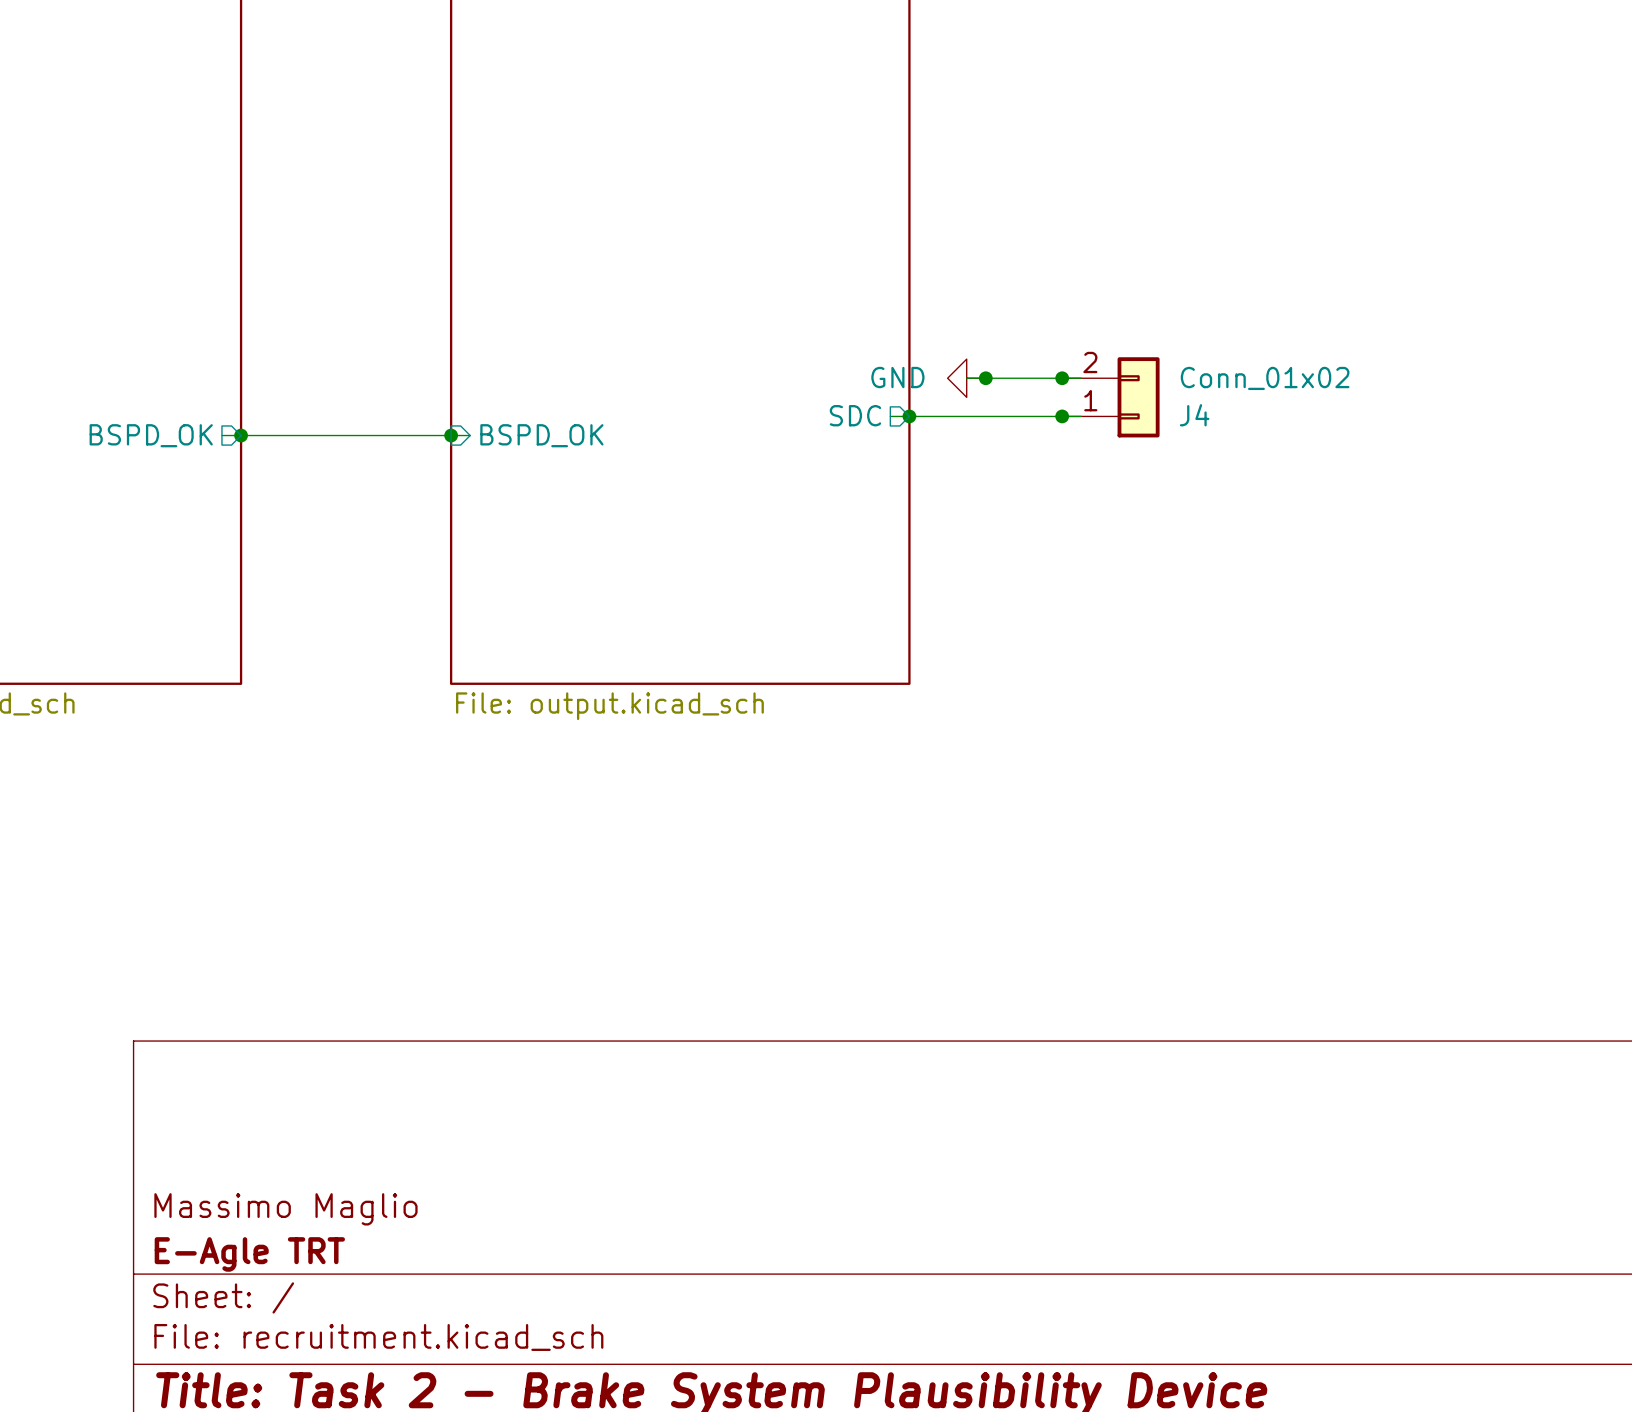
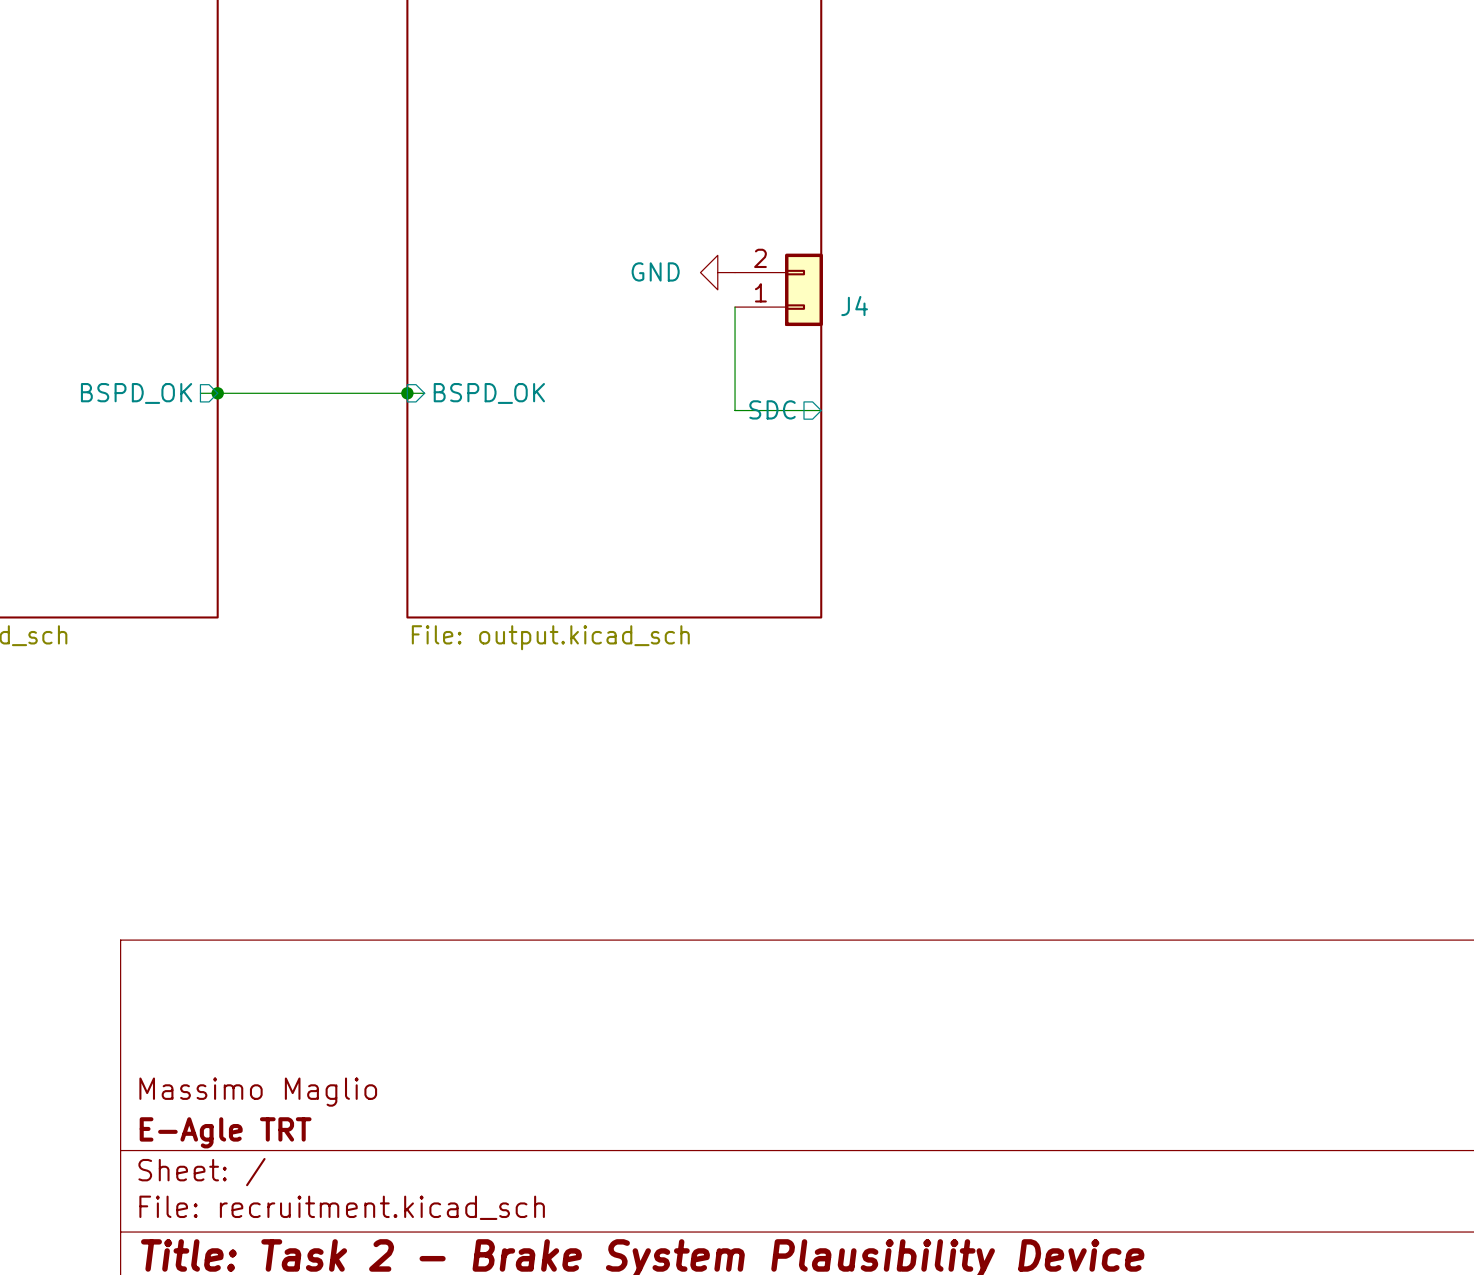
wire: none -> (735, 307) (735, 410) (821, 410)
wire: (966, 378) (1081, 378) -> none
power symbol position: GND (966, 378) -> GND (717, 272)
junction: (985, 378) -> none
junction: (1062, 378) -> none
J4 value: Conn_01x02 (1265, 378) -> none
J4 position: (1110, 397) -> (778, 289)
sheet pin position: SDC (855, 415) -> SDC (772, 409)
wire: (890, 416) (1081, 416) -> none
junction: (909, 416) -> none
junction: (1062, 416) -> none

